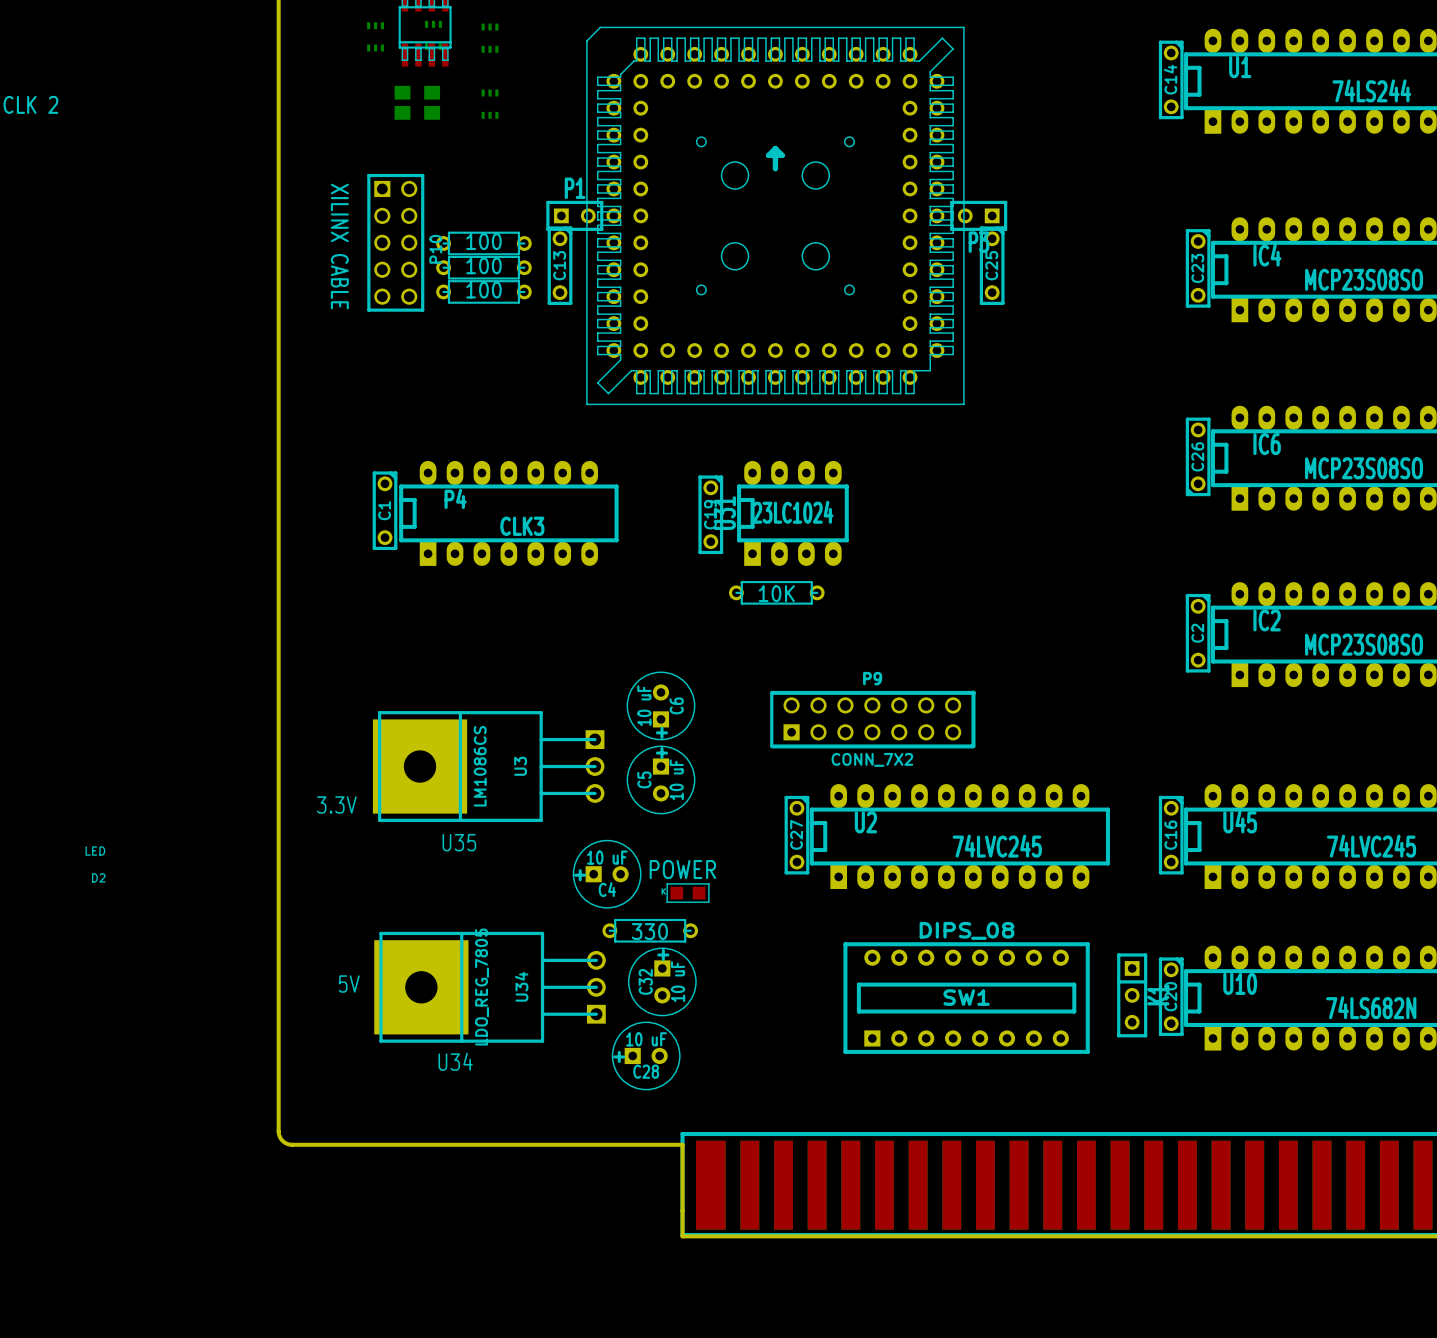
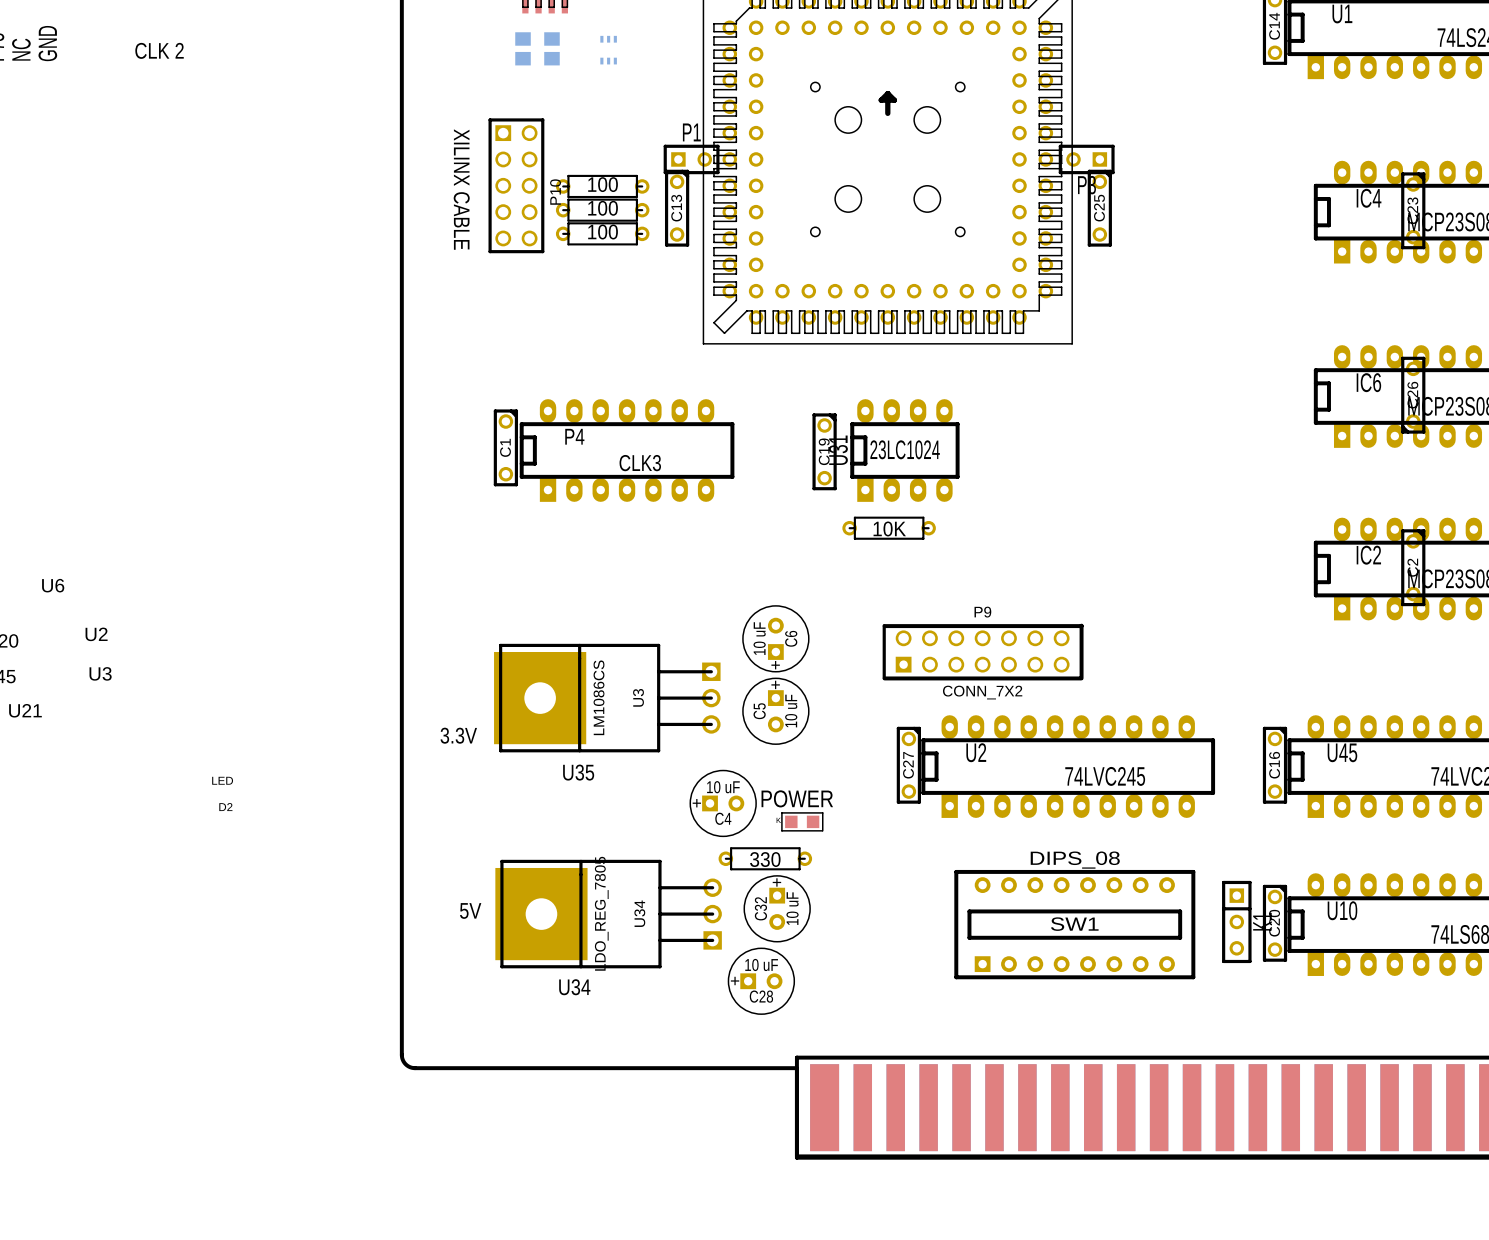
C23 position: (1198, 268) -> (1413, 210)
C26 position: (1198, 456) -> (1413, 395)
C2 position: (1198, 633) -> (1413, 567)

